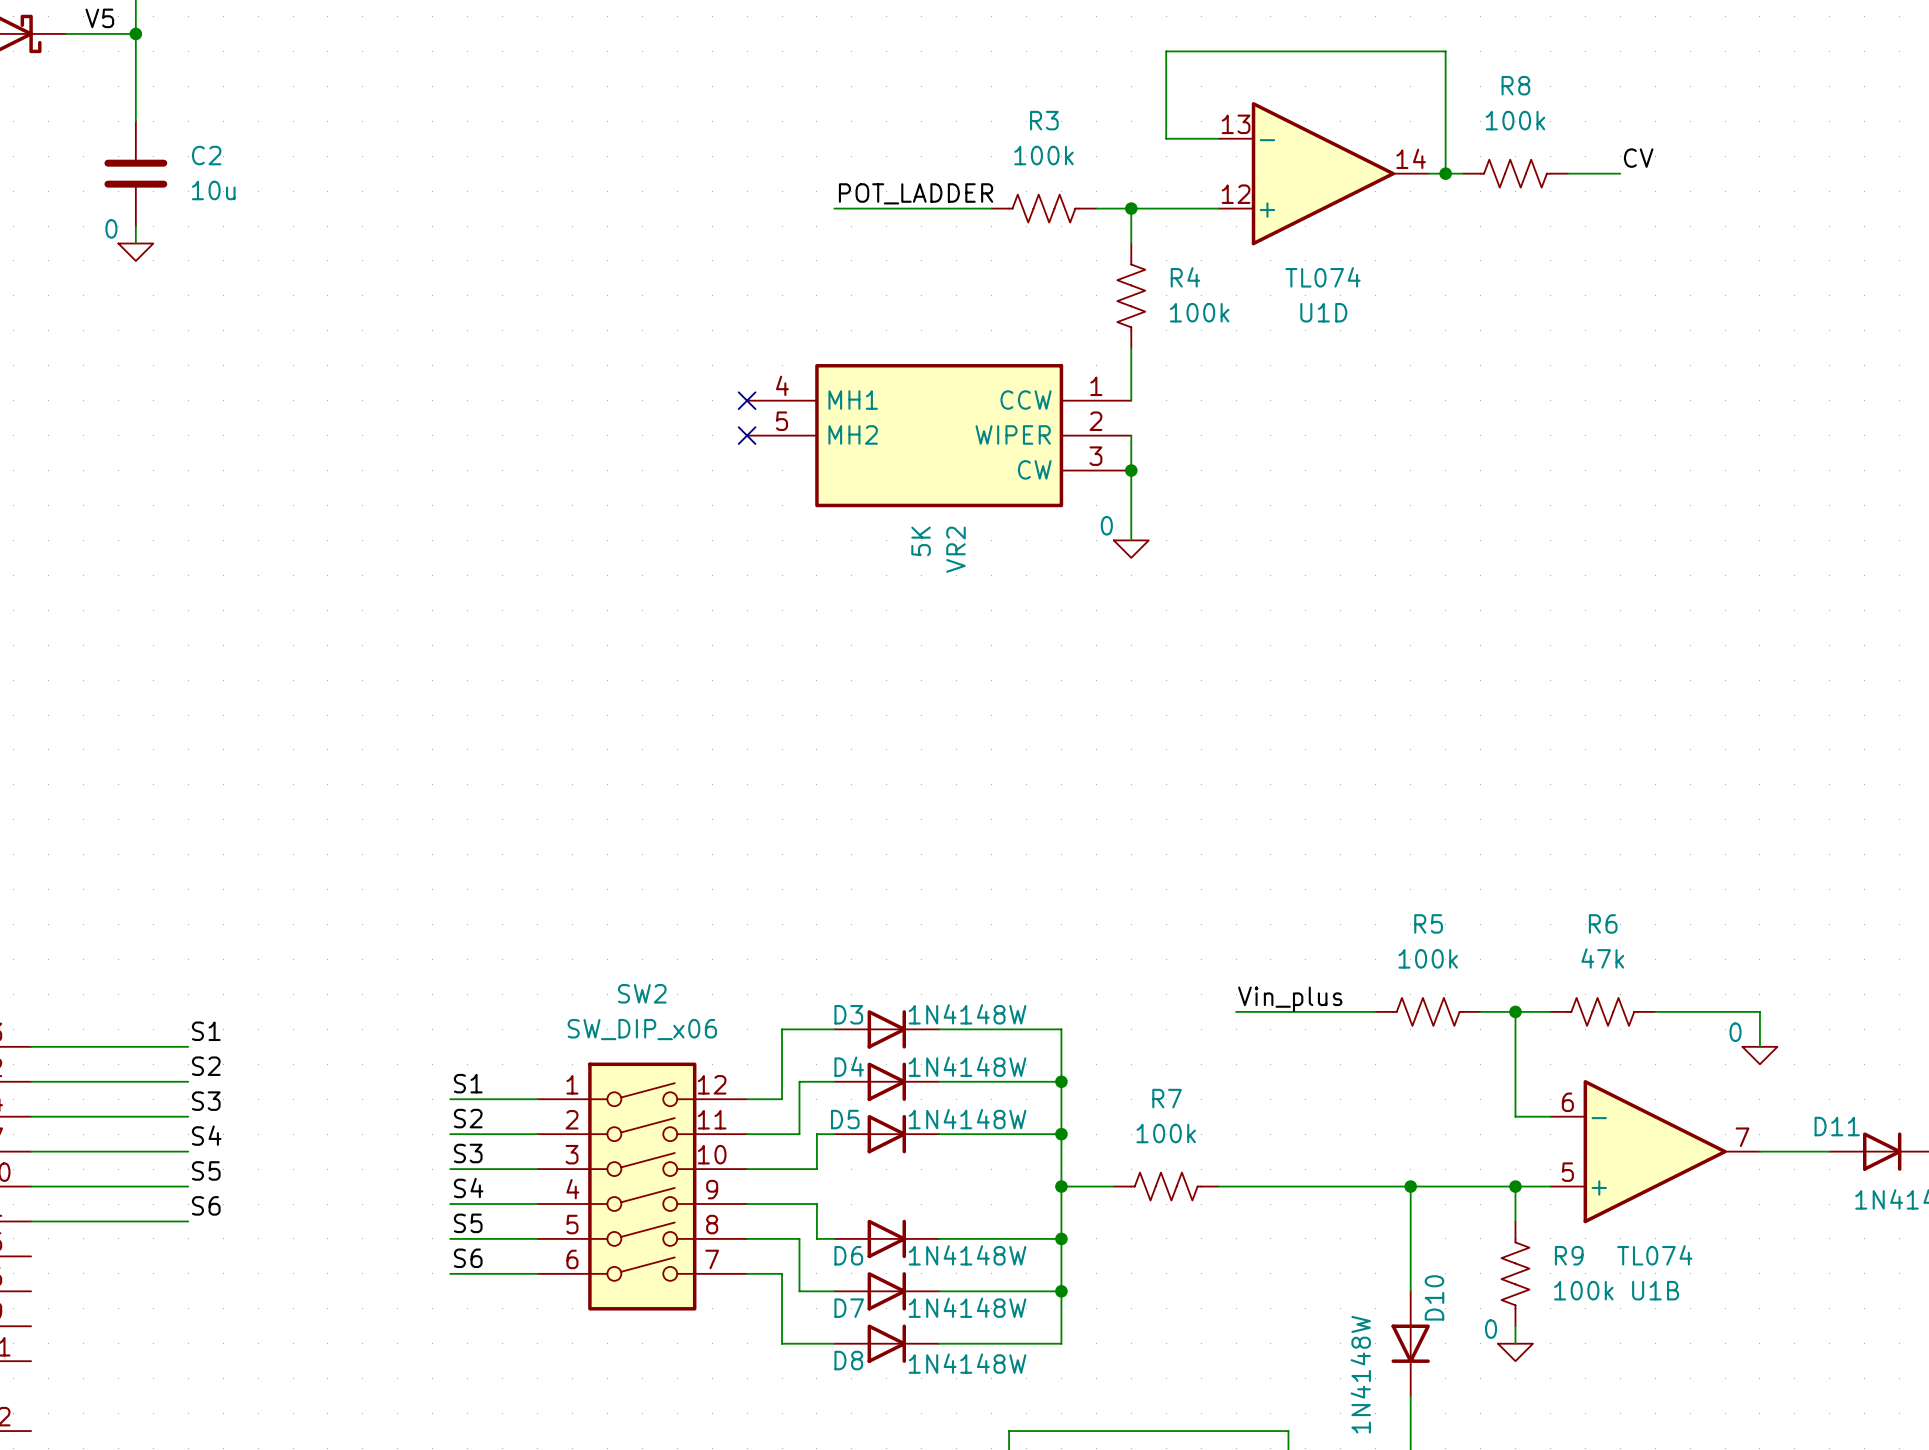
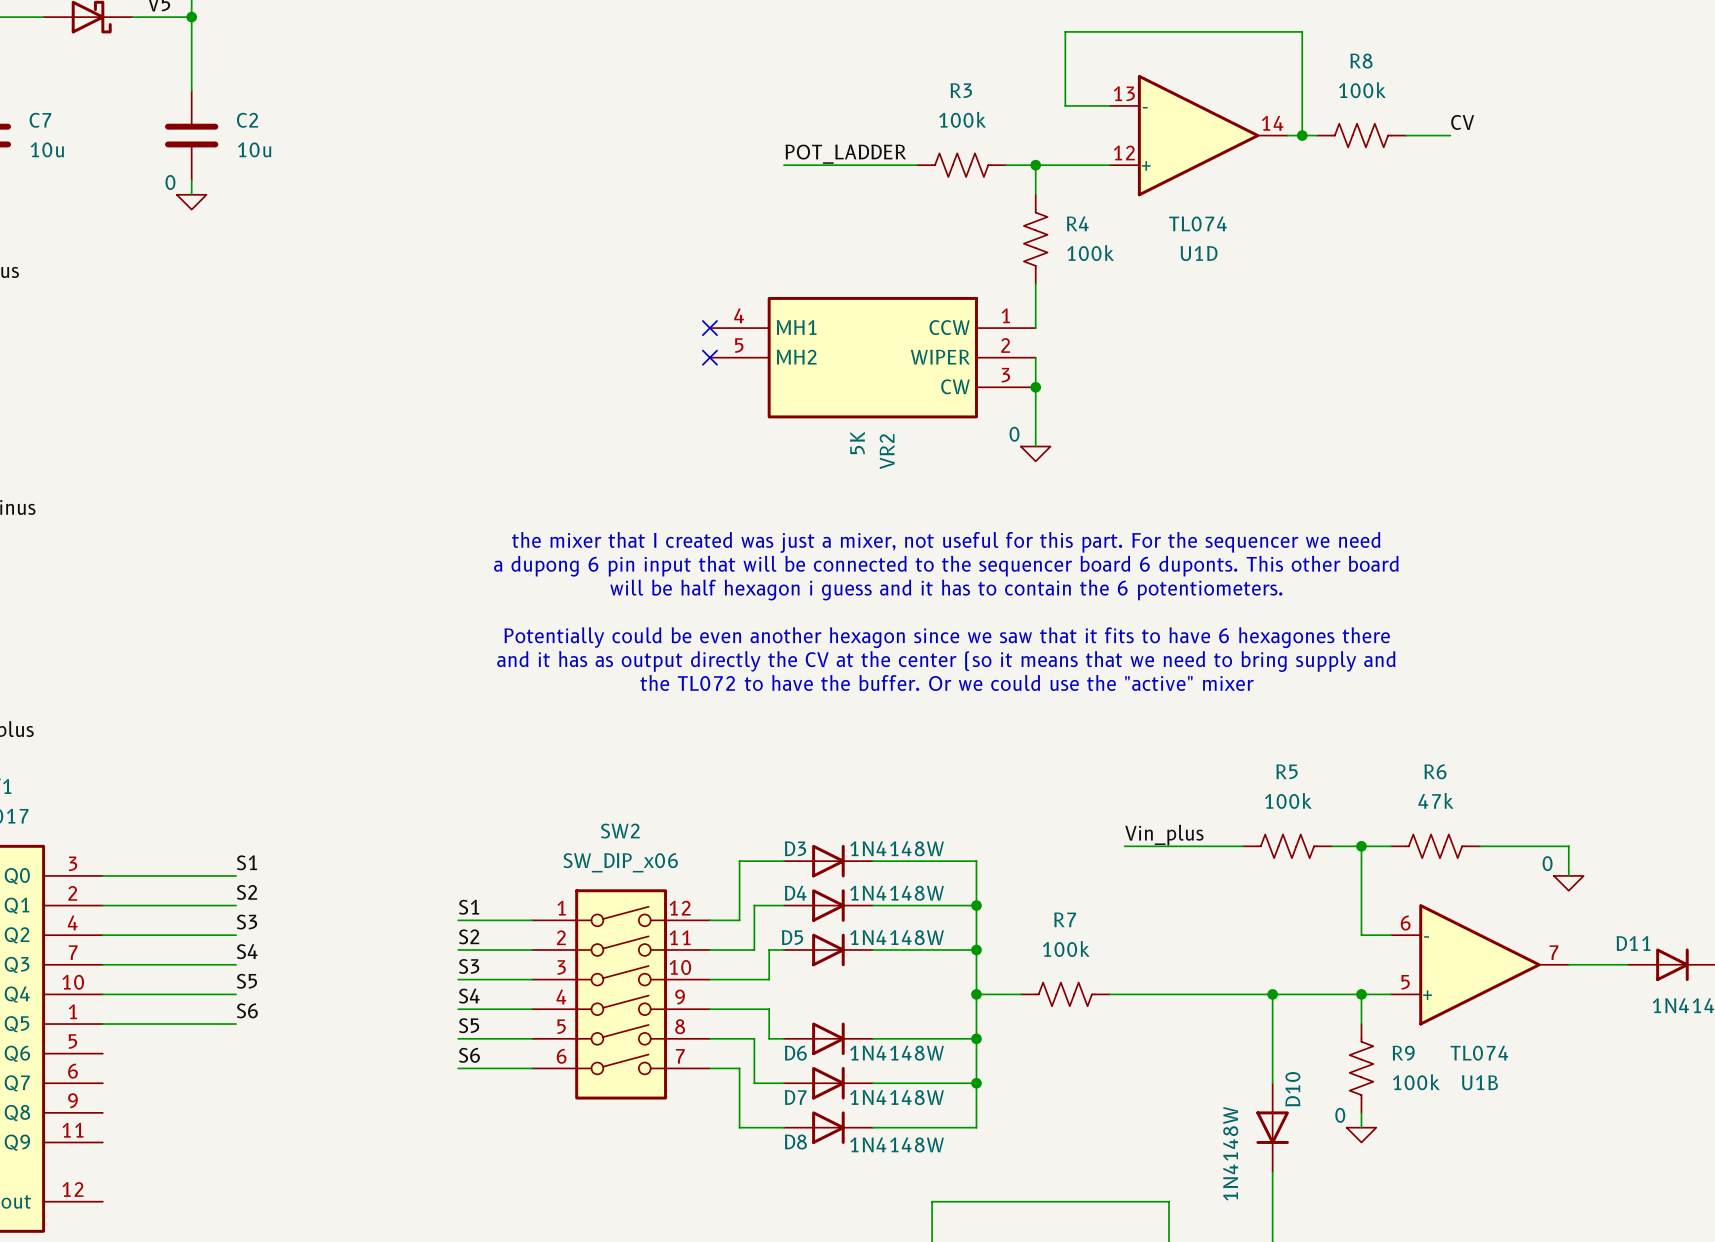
text: none -> the mixer that I created was just a mixer, not useful for this part. For the sequencer we need (946, 542)
text: none -> a dupong 6 pin input that will be connected to the sequencer board 6 duponts. This other board (946, 566)
text: none -> will be half hexagon i guess and it has to contain the 6 potentiometers. (946, 590)
text: none -> Potentially could be even another hexagon since we saw that it fits to have 6 hexagones there (947, 637)
text: none -> and it has as output directly the CV at the center (so it means that we need to bring supply and (946, 661)
text: none -> the TL072 to have the buffer. Or we could use the "active" mixer (947, 682)

